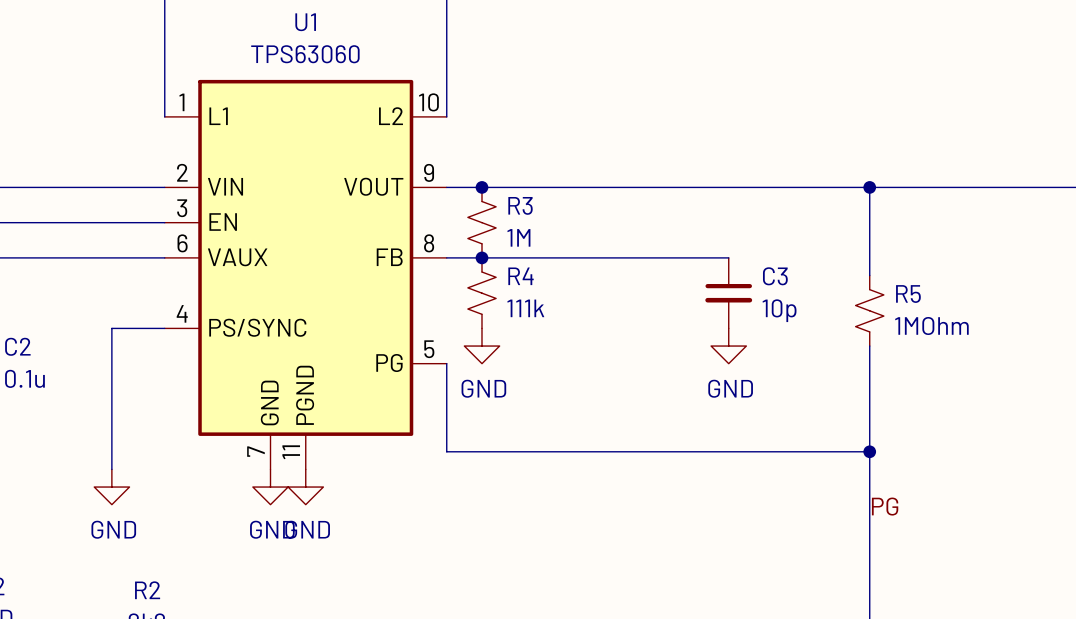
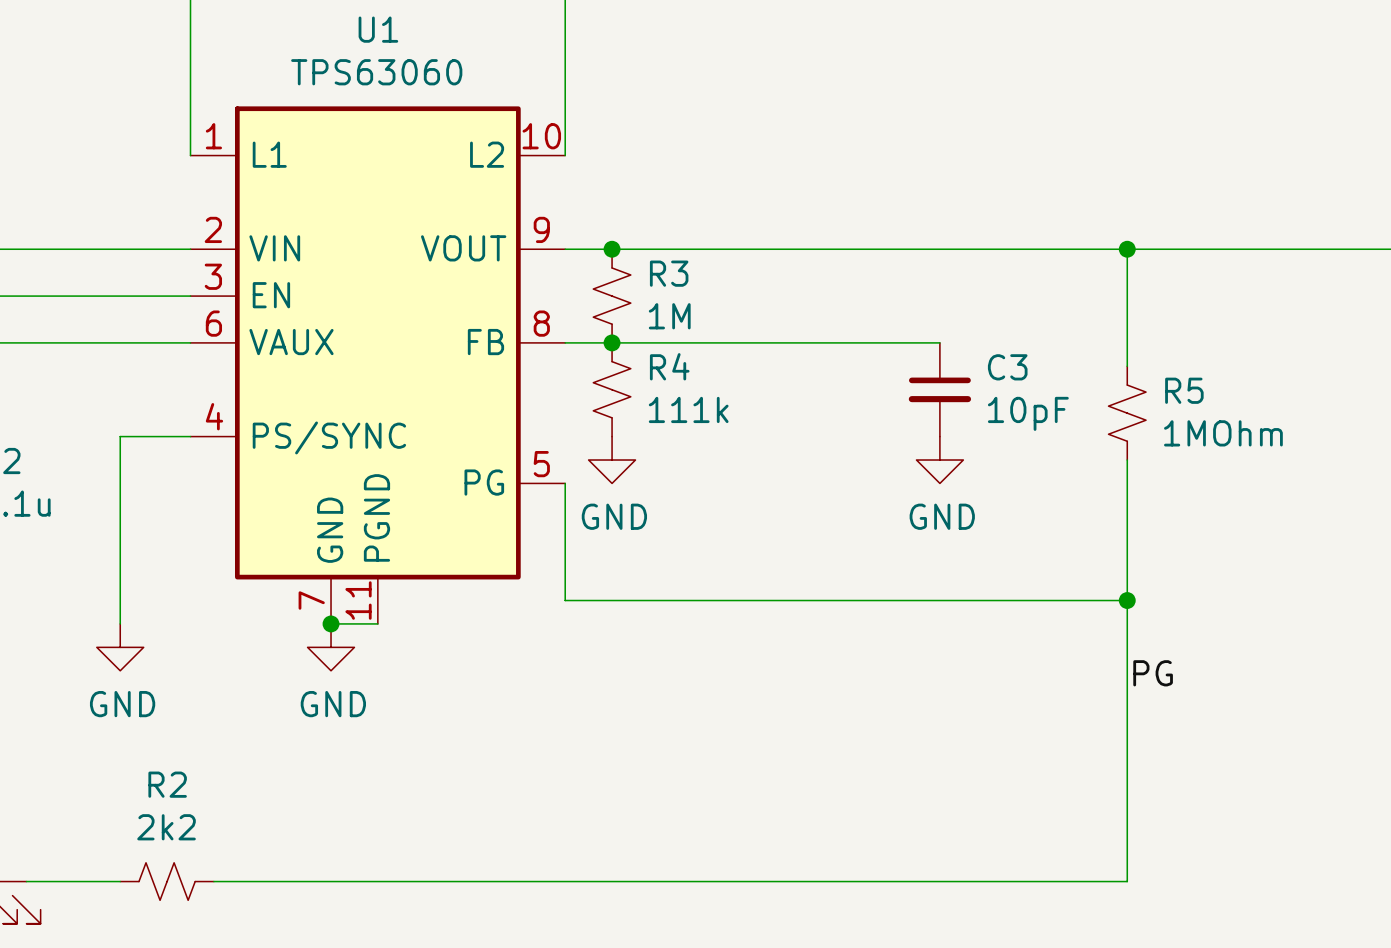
C3 value: 10p (779, 310) -> 10pF (1028, 413)
wire: none -> (331, 623) (377, 623)
junction: none -> (331, 623)
power symbol: GND (305, 487) -> none

